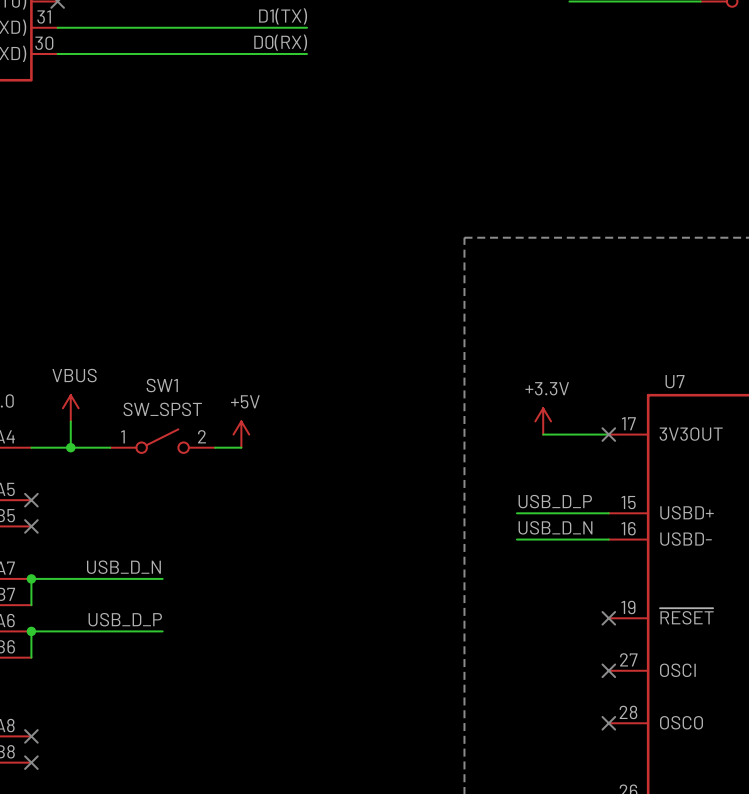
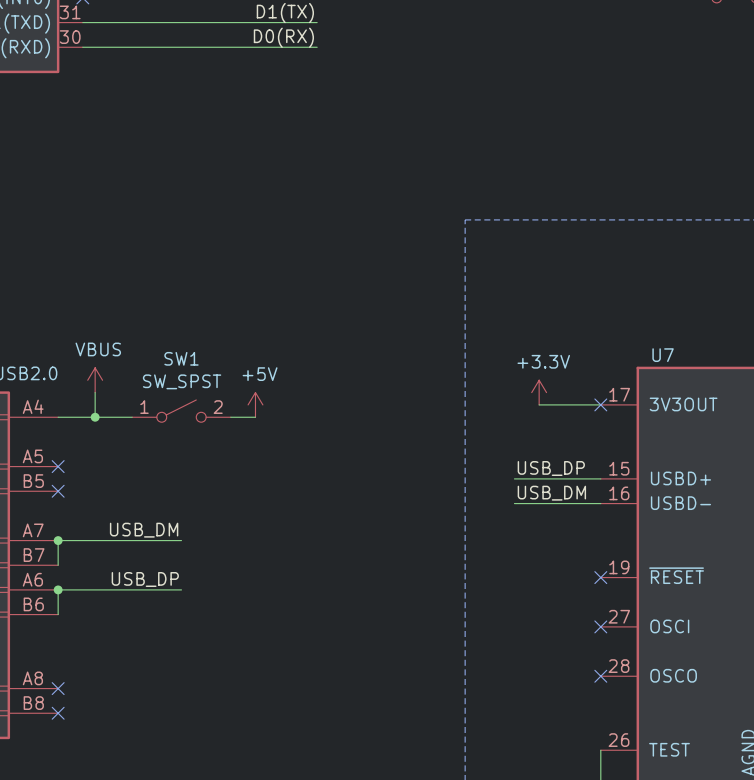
label: USB_D_P (555, 501) -> USB_DP (551, 468)
label: USB_D_N (555, 527) -> USB_DM (551, 493)
label: USB_D_N (123, 567) -> USB_DM (144, 530)
label: USB_D_P (125, 619) -> USB_DP (145, 579)

